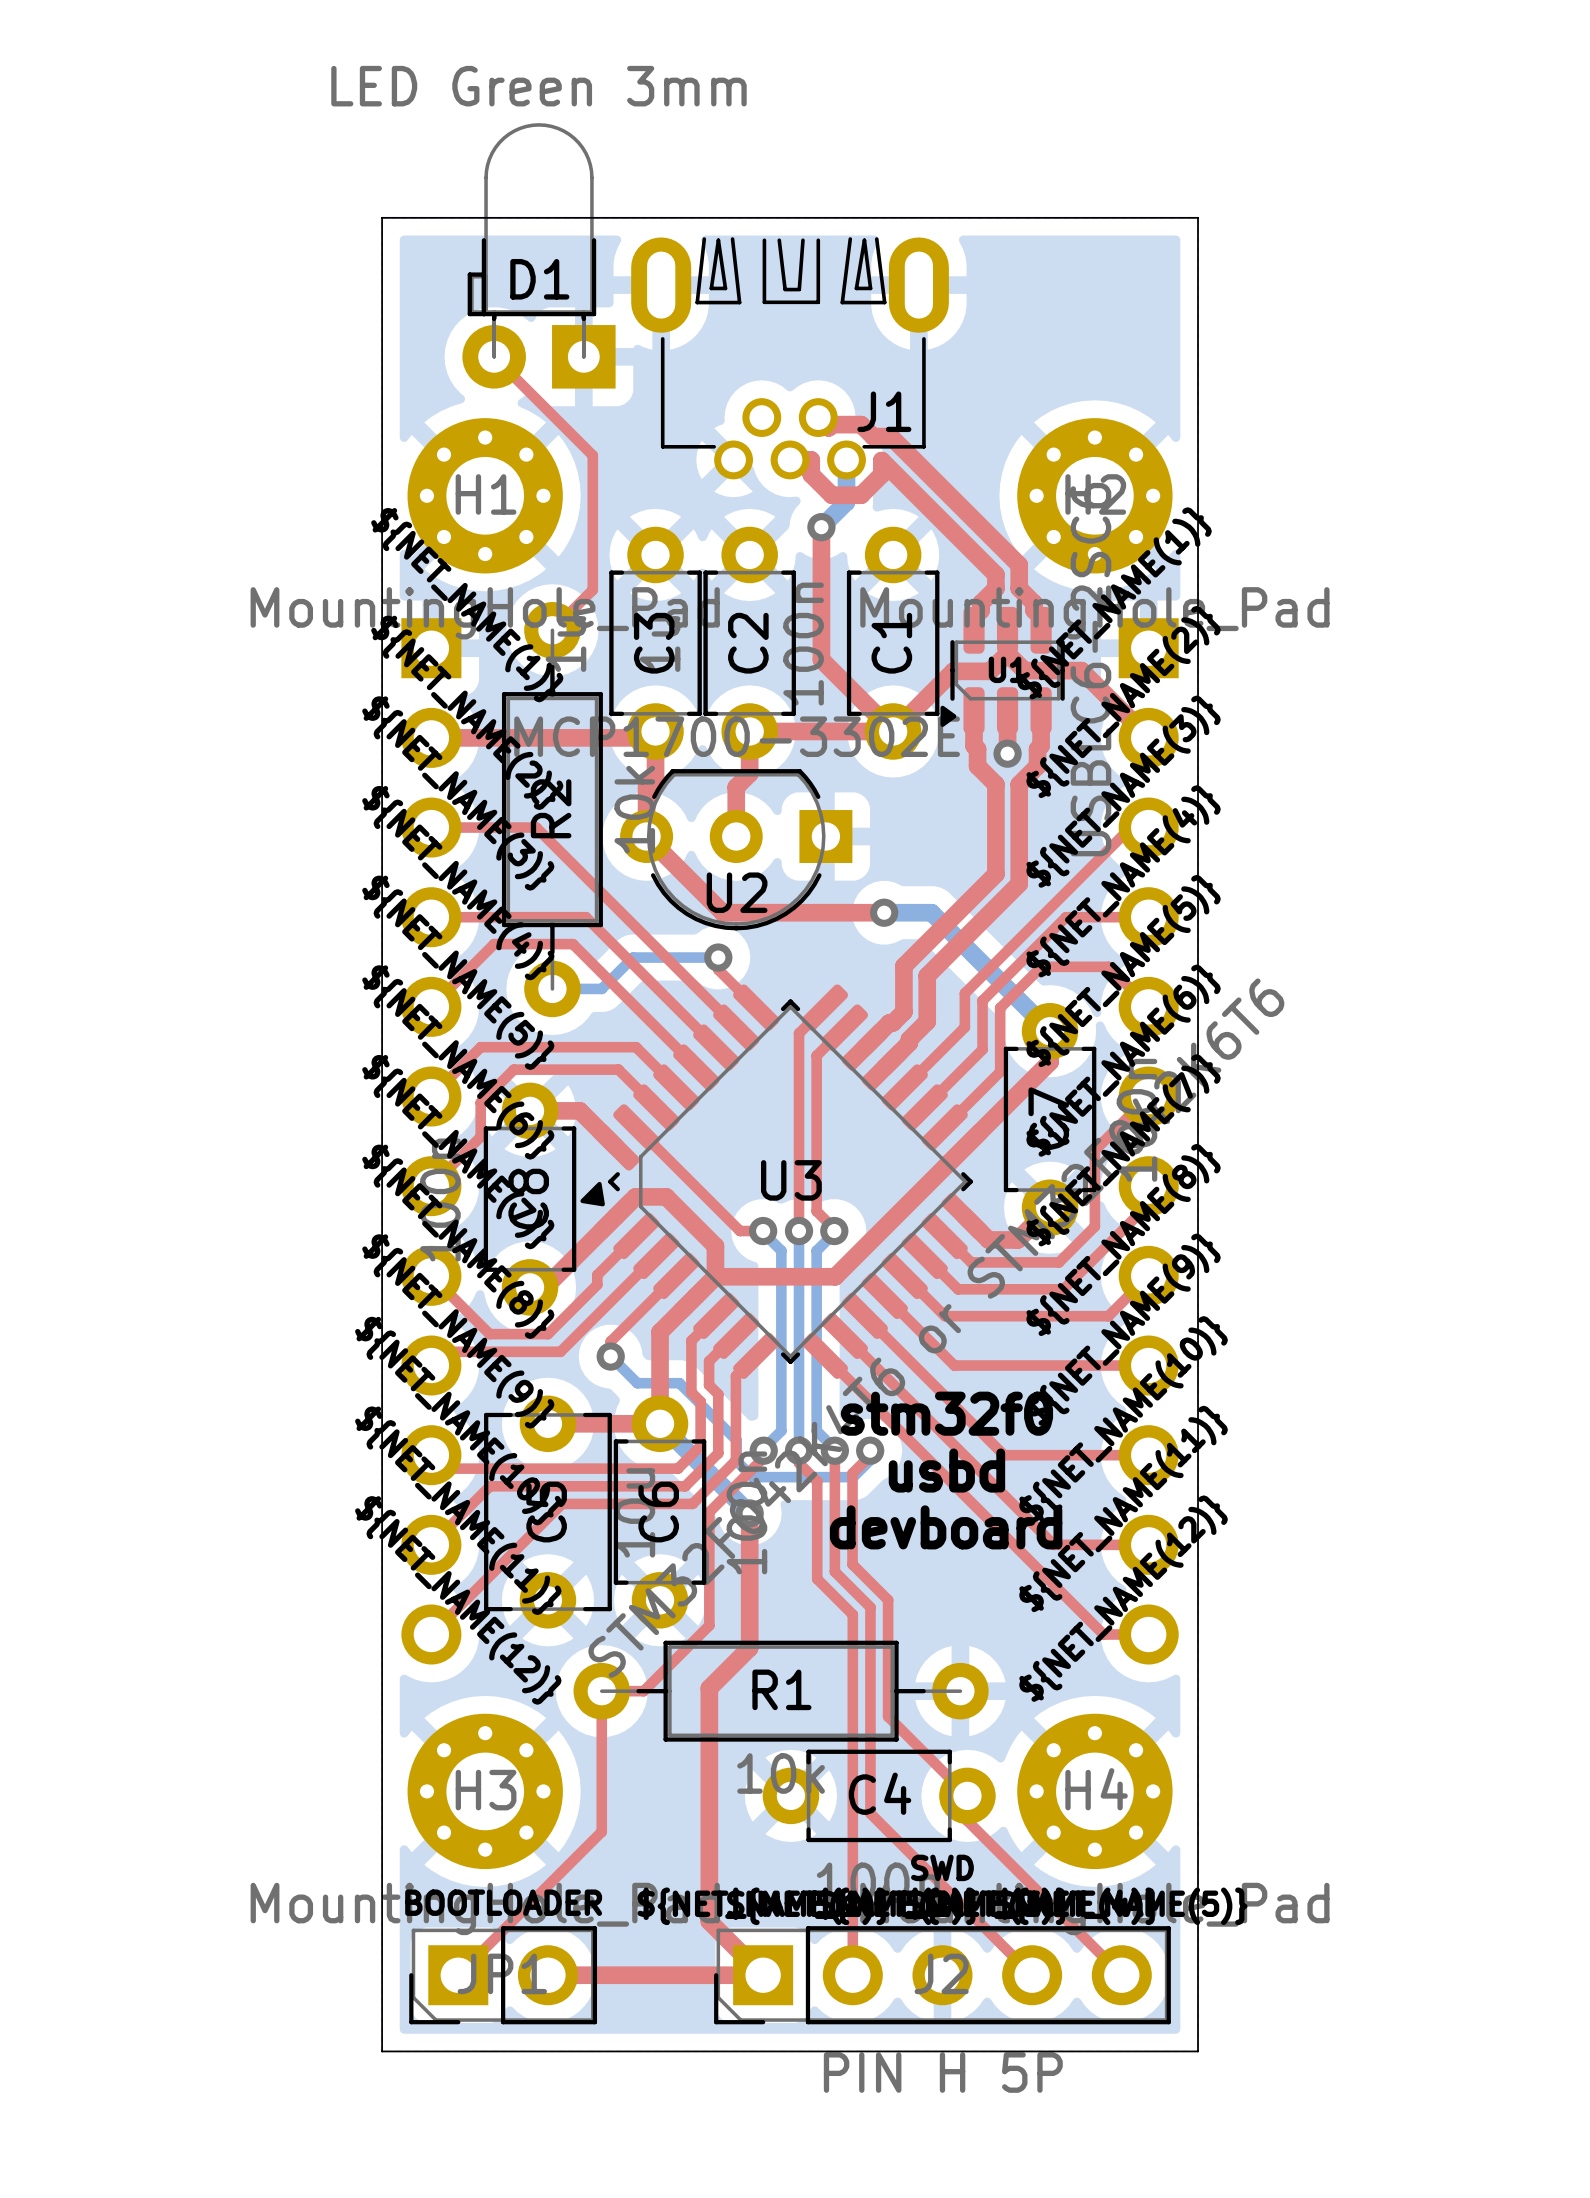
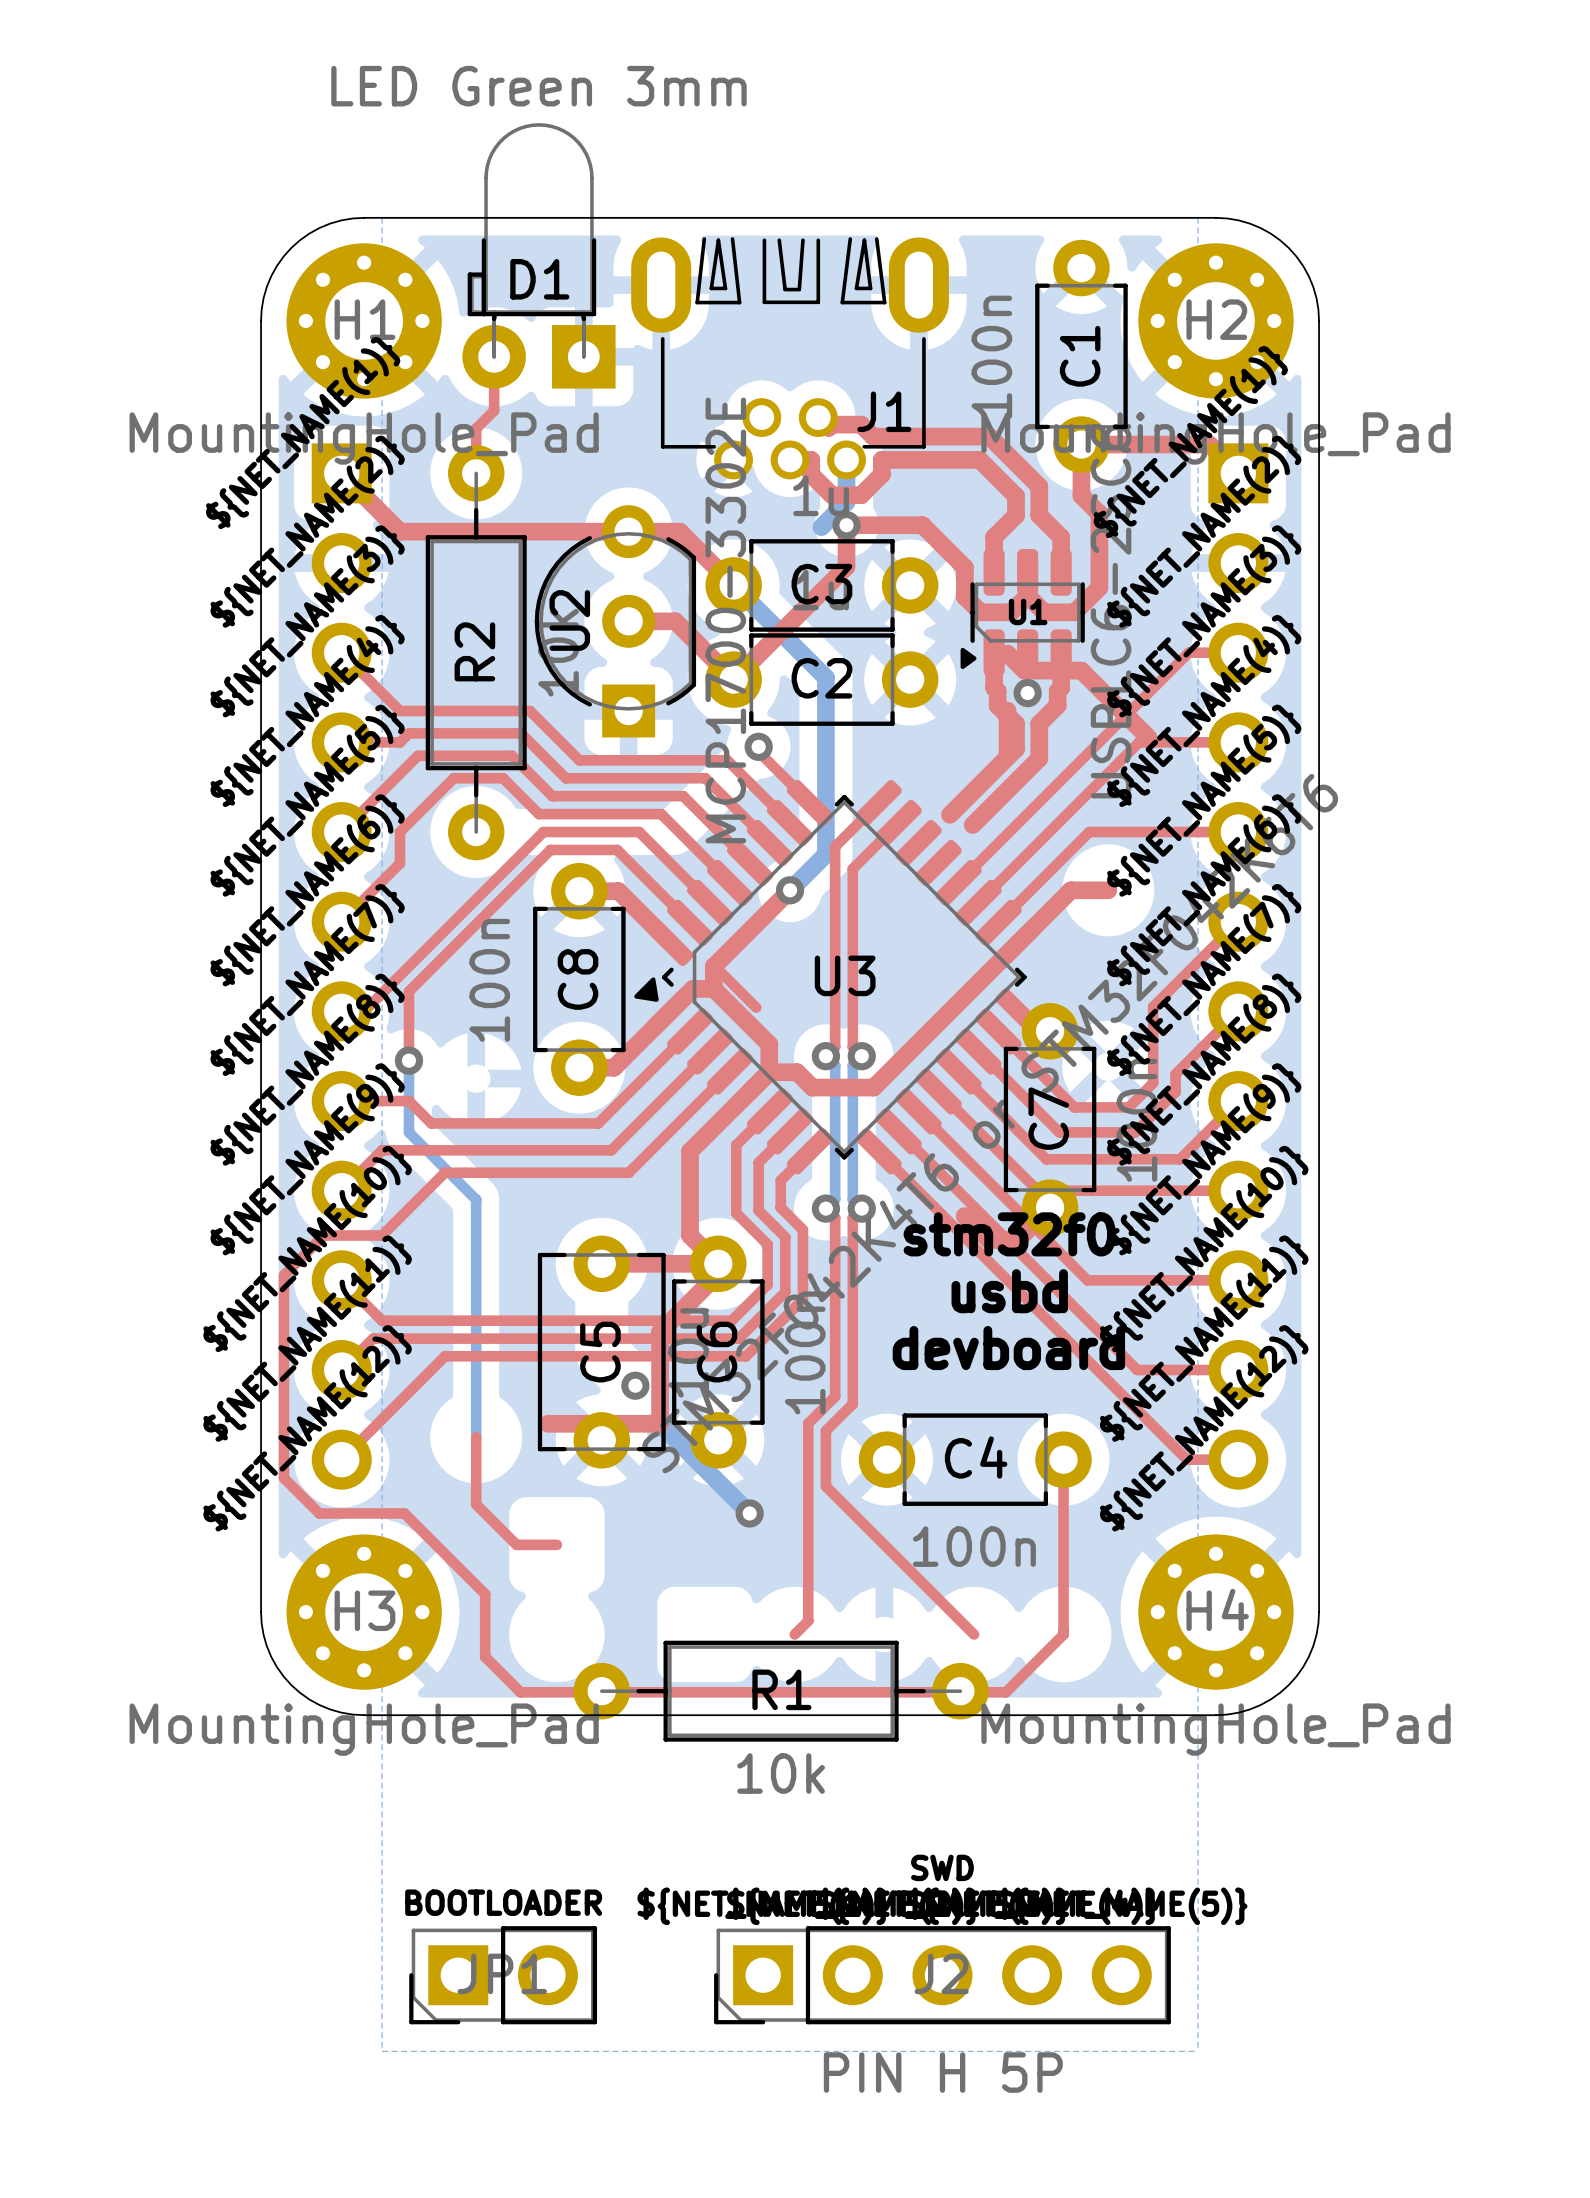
board edge: (382, 217) (382, 2051) (1198, 2051) (1198, 217) -> (382, 217) (341, 220) (319, 228) (299, 240) (283, 256) (271, 276) (263, 298) (261, 320) (261, 1623) (271, 1656) (291, 1685) (309, 1699) (330, 1709) (364, 1715) (1215, 1715) (1238, 1712) (1260, 1704) (1288, 1685) (1303, 1666) (1316, 1635) (1319, 1612) (1318, 309) (1308, 276) (1296, 256) (1280, 240) (1260, 228) (1238, 220) (1198, 217)
top track: (494, 356) (592, 455) (592, 589) (552, 630) -> (494, 356) (494, 410) (476, 428) (476, 473)
top track: (890, 436) (1019, 565) (1019, 588) (1034, 603) (1034, 610) (1041, 617) (1041, 630) -> (890, 436) (989, 436) (1039, 486) (1039, 515) (1061, 537) (1061, 572)
top track: (881, 460) (995, 574) (995, 588) (981, 603) (981, 610) (974, 617) (974, 630) -> (881, 459) (979, 459) (1016, 496) (1016, 515) (994, 537) (994, 572)
top track: none -> (341, 473) (400, 531) (679, 531) (733, 585)
top track: none -> (1238, 477) (1238, 473) (1209, 444) (1081, 444) (1081, 495) (1099, 513) (1099, 587) (1074, 612) (1044, 612) (1027, 595)
H1 position: (485, 495) -> (364, 320)
H2 position: (1094, 495) -> (1215, 320)
top track: (821, 527) (821, 659) (893, 731) -> none
via position: (821, 527) -> (846, 525)
bottom track: none -> (733, 585) (825, 677) (825, 854) (790, 890)
top track: none -> (1027, 595) (1011, 612) (980, 612) (964, 596) (964, 567) (922, 525) (846, 525) (846, 566) (733, 679) (675, 621) (628, 621)
top track: (1007, 630) (1007, 653) (989, 671) (953, 671) (893, 731) -> none
C3 rotation: 0° (655, 643) -> 90° clockwise (821, 585)
C3 position: (655, 643) -> (821, 585)
C2 rotation: 0° (749, 643) -> 90° clockwise (821, 679)
C1 position: (893, 643) -> (1081, 356)
top track: none -> (341, 652) (400, 710) (530, 710) (579, 760) (727, 760) (790, 823)
top track: none -> (994, 652) (994, 687) (997, 691) (997, 705) (1016, 723) (1016, 748) (949, 814)
top track: none -> (1061, 652) (1061, 687) (1057, 691) (1057, 705) (1039, 723) (1039, 758) (972, 825)
top track: none -> (1238, 652) (1188, 652) (958, 882)
U1 position: (1002, 670) -> (1022, 612)
top track: (974, 710) (974, 745) (977, 749) (977, 766) (995, 784) (995, 874) (903, 966) (903, 1011) (892, 1022) (889, 1022) (864, 1047) -> none
top track: (1041, 710) (1041, 745) (1037, 749) (1037, 766) (1019, 784) (1019, 883) (927, 975) (927, 1021) (884, 1067) -> none
top track: (893, 731) (749, 731) (749, 773) (736, 787) (736, 836) -> none
top track: (431, 737) (649, 737) (655, 731) (655, 778) (646, 787) (646, 836) (722, 912) (884, 912) -> none
top track: none -> (341, 742) (400, 742) (408, 733) (521, 733) (565, 778) (705, 778) (770, 843)
top track: none -> (1238, 742) (1139, 742) (978, 902)
top track: none -> (758, 746) (758, 751) (810, 803)
via: none -> (758, 746)
via position: (1007, 753) -> (1027, 693)
top track: none -> (878, 803) (835, 846) (835, 1046) (825, 1056)
R2 position: (552, 809) -> (476, 652)
top track: none -> (898, 823) (852, 868) (852, 1047) (861, 1056)
top track: (431, 827) (536, 827) (736, 1027) -> none
top track: (1148, 827) (1130, 827) (964, 993) (964, 1027) (904, 1087) -> none
top track: none -> (341, 832) (417, 755) (512, 755) (552, 796) (683, 796) (750, 863)
top track: none -> (1238, 832) (1089, 832) (998, 922)
U2 rotation: 0° (736, 849) -> 90° clockwise (615, 621)
U2 position: (736, 849) -> (615, 621)
top track: none -> (730, 882) (661, 814) (538, 814) (503, 778) (453, 778) (400, 832) (400, 863) (341, 921)
top track: none -> (790, 890) (713, 966) (713, 988)
via: none -> (790, 890)
top track: none -> (1108, 890) (1071, 890) (873, 1087) (812, 1087) (797, 1072) (769, 1072)
top track: none -> (579, 891) (618, 891) (670, 942)
top track: none -> (710, 902) (639, 832) (543, 832) (364, 1011) (341, 1011)
bottom track: (884, 912) (931, 912) (1050, 1031) -> none
via: (884, 912) -> none
top track: (431, 917) (585, 917) (716, 1047) -> none
top track: (1148, 917) (1066, 917) (982, 1000) (982, 1049) (924, 1107) -> none
top track: none -> (1238, 921) (1153, 1006) (1153, 1083) (1128, 1107) (1074, 1107) (998, 1031)
top track: none -> (690, 922) (617, 849) (550, 849) (408, 991) (408, 1060)
bottom track: (718, 957) (633, 957) (601, 988) (552, 988) -> none
via: (718, 957) -> none
part: none -> (341, 966)
part: none -> (1238, 966)
top track: none -> (713, 988) (769, 1044) (769, 1072)
top track: none -> (713, 988) (692, 988) (614, 1067) (579, 1067)
top track: (431, 1006) (494, 944) (572, 944) (696, 1067) -> none
top track: (1148, 1006) (1108, 966) (1041, 966) (1000, 1008) (1000, 1071) (944, 1127) -> none
top track: (824, 1007) (799, 1033) (799, 1231) -> none
top track: none -> (1238, 1011) (1175, 1074) (1175, 1092) (1135, 1132) (1059, 1132) (978, 1051)
top track: (844, 1027) (816, 1055) (816, 1211) (834, 1231) -> none
top track: none -> (690, 1031) (598, 1123) (431, 1123) (408, 1101) (341, 1101)
top track: (1050, 1031) (1050, 1061) (835, 1276) (715, 1276) (715, 1246) (666, 1196) (635, 1196) (545, 1287) (530, 1287) -> none
top track: none -> (710, 1051) (611, 1150) (382, 1150) (341, 1190)
bottom track: none -> (825, 1056) (835, 1065) (835, 1199) (825, 1208)
via: none -> (825, 1056)
bottom track: none -> (861, 1056) (852, 1065) (852, 1199) (861, 1208)
via: none -> (861, 1056)
bottom track: none -> (408, 1060) (408, 1132) (476, 1199) (476, 1437)
via: none -> (408, 1060)
top track: none -> (958, 1071) (1046, 1159) (1180, 1159) (1238, 1101)
top track: none -> (769, 1072) (690, 1151) (690, 1235) (718, 1263) (601, 1263)
top track: (676, 1087) (636, 1047) (480, 1047) (431, 1096) -> none
top track: none -> (938, 1091) (1037, 1190) (1238, 1190)
top track: (1148, 1096) (1094, 1150) (1094, 1226) (1059, 1262) (971, 1262) (944, 1236) -> none
top track: (656, 1107) (618, 1069) (513, 1069) (480, 1102) (480, 1136) (444, 1172) -> (730, 1071) (628, 1172) (444, 1172)
top track: (530, 1110) (579, 1110) (616, 1147) -> none
top track: none -> (770, 1111) (736, 1145) (736, 1213) (767, 1244) (767, 1284) (731, 1320) (382, 1320) (341, 1280)
top track: none -> (918, 1111) (1087, 1280) (1238, 1280)
top track: (636, 1127) (740, 1231) (763, 1231) -> none
top track: none -> (790, 1131) (758, 1162) (758, 1210) (785, 1237) (785, 1292) (738, 1338) (373, 1338) (341, 1370)
top track: none -> (898, 1131) (1137, 1370) (1238, 1370)
part: (431, 1141) -> none
part: (1148, 1141) -> none
top track: none -> (810, 1151) (780, 1180) (780, 1207) (802, 1229) (802, 1299) (746, 1356) (445, 1356) (341, 1459)
top track: none -> (878, 1151) (1187, 1459) (1238, 1459)
U3 position: (784, 1181) -> (837, 977)
top track: none -> (431, 1186) (382, 1235) (323, 1235) (283, 1275) (283, 1478) (319, 1513) (404, 1513) (485, 1594) (485, 1656) (520, 1692) (1005, 1692) (1063, 1634) (1063, 1630)
top track: (1148, 1186) (1148, 1204) (1063, 1289) (958, 1289) (924, 1255) -> none
C8 position: (530, 1199) -> (579, 979)
top track: none -> (825, 1208) (835, 1217) (835, 1396) (808, 1423) (808, 1620) (794, 1634)
via: none -> (825, 1208)
top track: none -> (861, 1208) (852, 1217) (852, 1403) (825, 1430) (825, 1486) (974, 1634)
via: none -> (861, 1208)
bottom track: (763, 1231) (781, 1250) (781, 1430) (763, 1450) -> none
via: (763, 1231) -> none
bottom track: (799, 1231) (799, 1450) -> none
via: (799, 1231) -> none
bottom track: (834, 1231) (816, 1250) (816, 1430) (834, 1450) -> none
via: (834, 1231) -> none
top track: (636, 1236) (597, 1275) (597, 1284) (547, 1334) (489, 1334) (431, 1275) -> none
top track: (656, 1255) (560, 1351) (445, 1351) (431, 1365) -> none
top track: (676, 1275) (610, 1341) (610, 1356) -> none
top track: (904, 1275) (945, 1316) (1108, 1316) (1148, 1275) -> none
top track: (884, 1295) (954, 1365) (1148, 1365) -> none
top track: (716, 1315) (691, 1340) (691, 1392) (700, 1401) (700, 1445) (677, 1468) (444, 1468) (431, 1455) -> none
top track: (864, 1315) (1004, 1455) (1148, 1455) -> none
top track: (736, 1335) (709, 1361) (709, 1385) (718, 1394) (718, 1453) (685, 1486) (489, 1486) (431, 1544) -> none
top track: (844, 1335) (1053, 1544) (1148, 1544) -> none
top track: (756, 1355) (735, 1376) (735, 1460) (692, 1503) (561, 1503) (431, 1634) -> none
top track: (824, 1355) (1103, 1634) (1148, 1634) -> none
bottom track: (610, 1356) (637, 1383) (679, 1383) (736, 1440) (736, 1461) (752, 1477) (853, 1477) (870, 1460) (870, 1450) -> none
via position: (610, 1356) -> (635, 1385)
text position: stm32f0 (946, 1413) -> stm32f0 (1009, 1234)
top track: none -> (476, 1437) (476, 1504) (516, 1544) (556, 1544)
top track: (763, 1450) (763, 1457) (709, 1512) (709, 1625) (643, 1691) (601, 1691) (601, 1831) (458, 1975) -> none
via: (763, 1450) -> none
top track: (799, 1450) (799, 1463) (817, 1481) (817, 1579) (852, 1614) (852, 1975) -> none
via: (799, 1450) -> none
top track: (834, 1450) (834, 1571) (870, 1607) (870, 1813) (1032, 1975) -> none
via: (834, 1450) -> none
top track: (870, 1450) (870, 1455) (852, 1473) (852, 1564) (888, 1600) (888, 1716) (967, 1795) (967, 1820) (1121, 1975) -> none
via: (870, 1450) -> none
top track: none -> (1063, 1459) (1063, 1630)
text position: usbd (946, 1470) -> usbd (1009, 1291)
C5 position: (547, 1512) -> (601, 1352)
C6 position: (660, 1512) -> (718, 1352)
top track: (749, 1513) (749, 1647) (709, 1688) (709, 1921) (763, 1975) (547, 1975) -> none
text position: devboard (946, 1527) -> devboard (1008, 1348)
H3 position: (485, 1791) -> (364, 1612)
H4 position: (1094, 1791) -> (1215, 1612)
C4 position: (879, 1795) -> (975, 1459)

